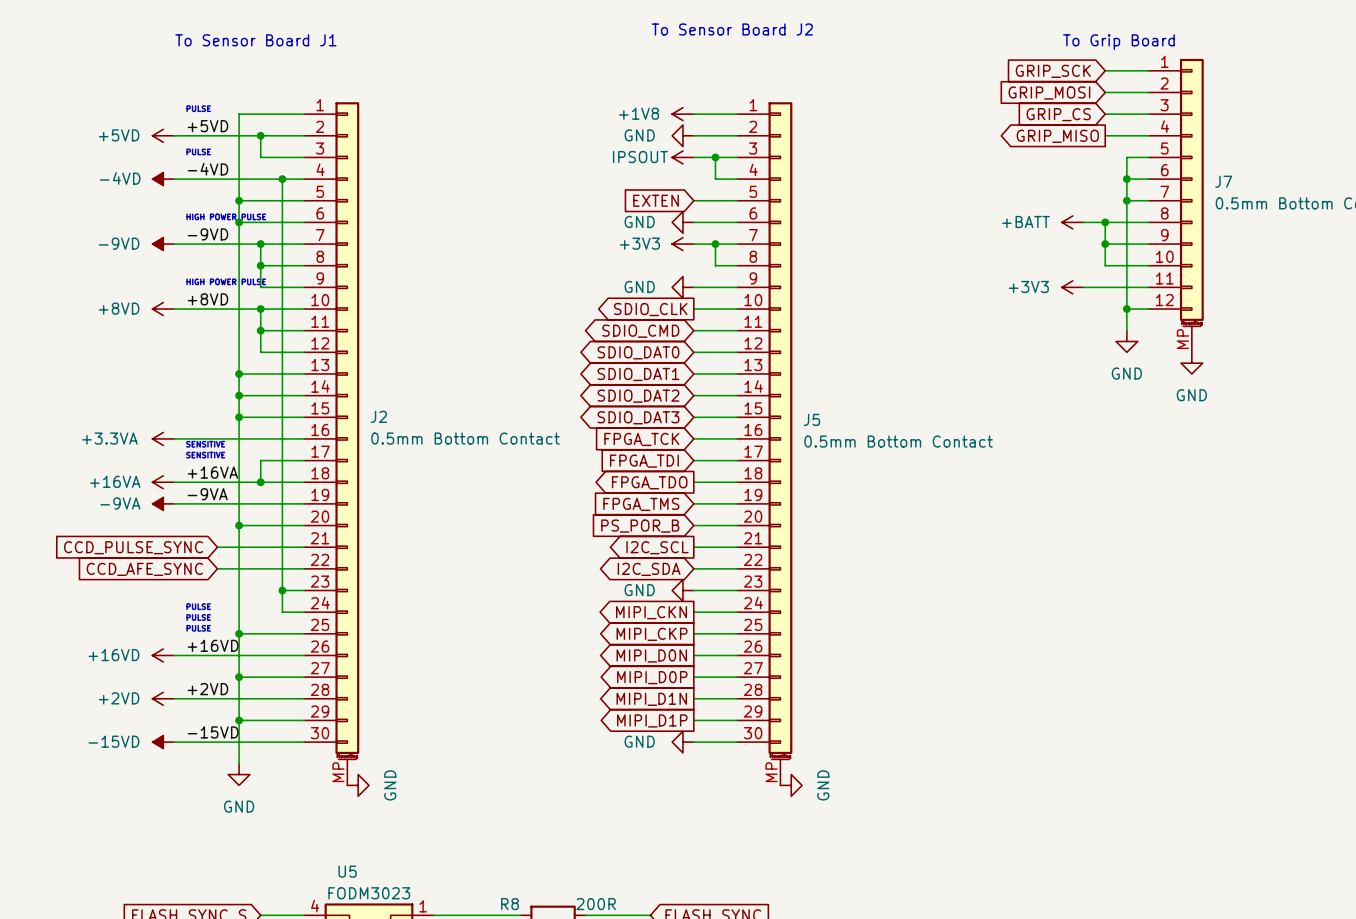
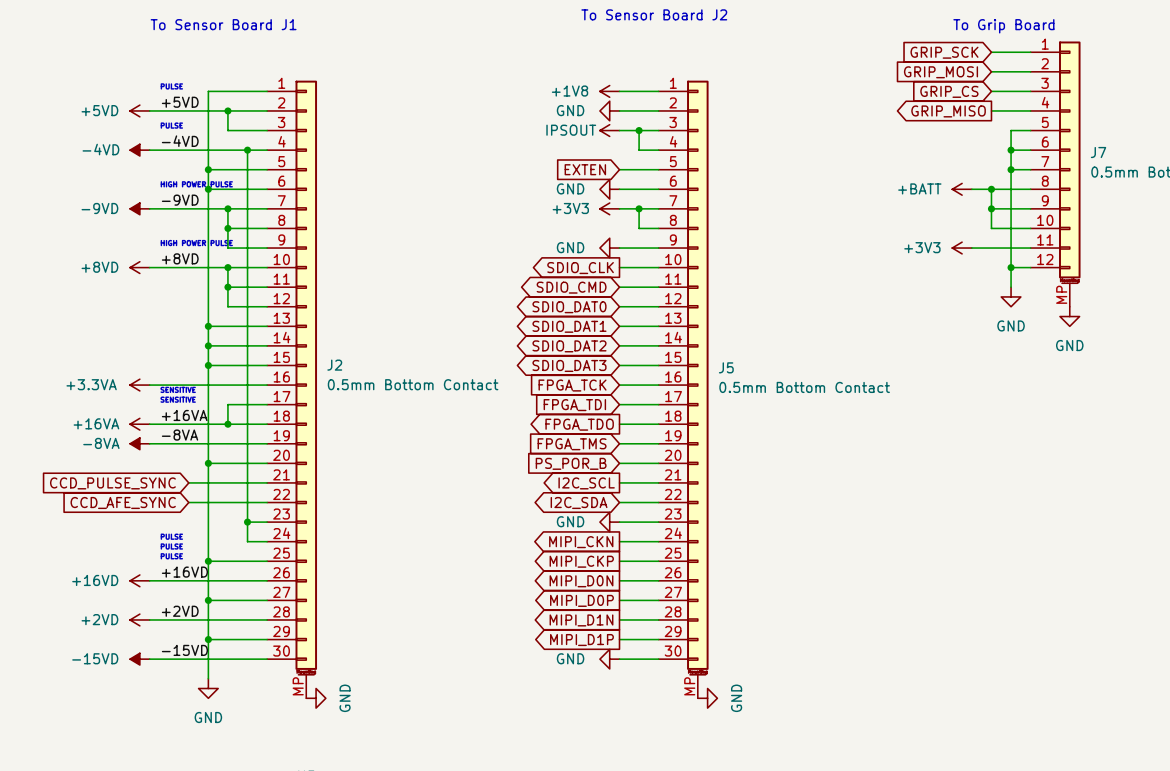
label: -9VA (207, 494) -> -8VA (180, 435)
power symbol: -9VA (163, 503) -> -8VA (139, 443)

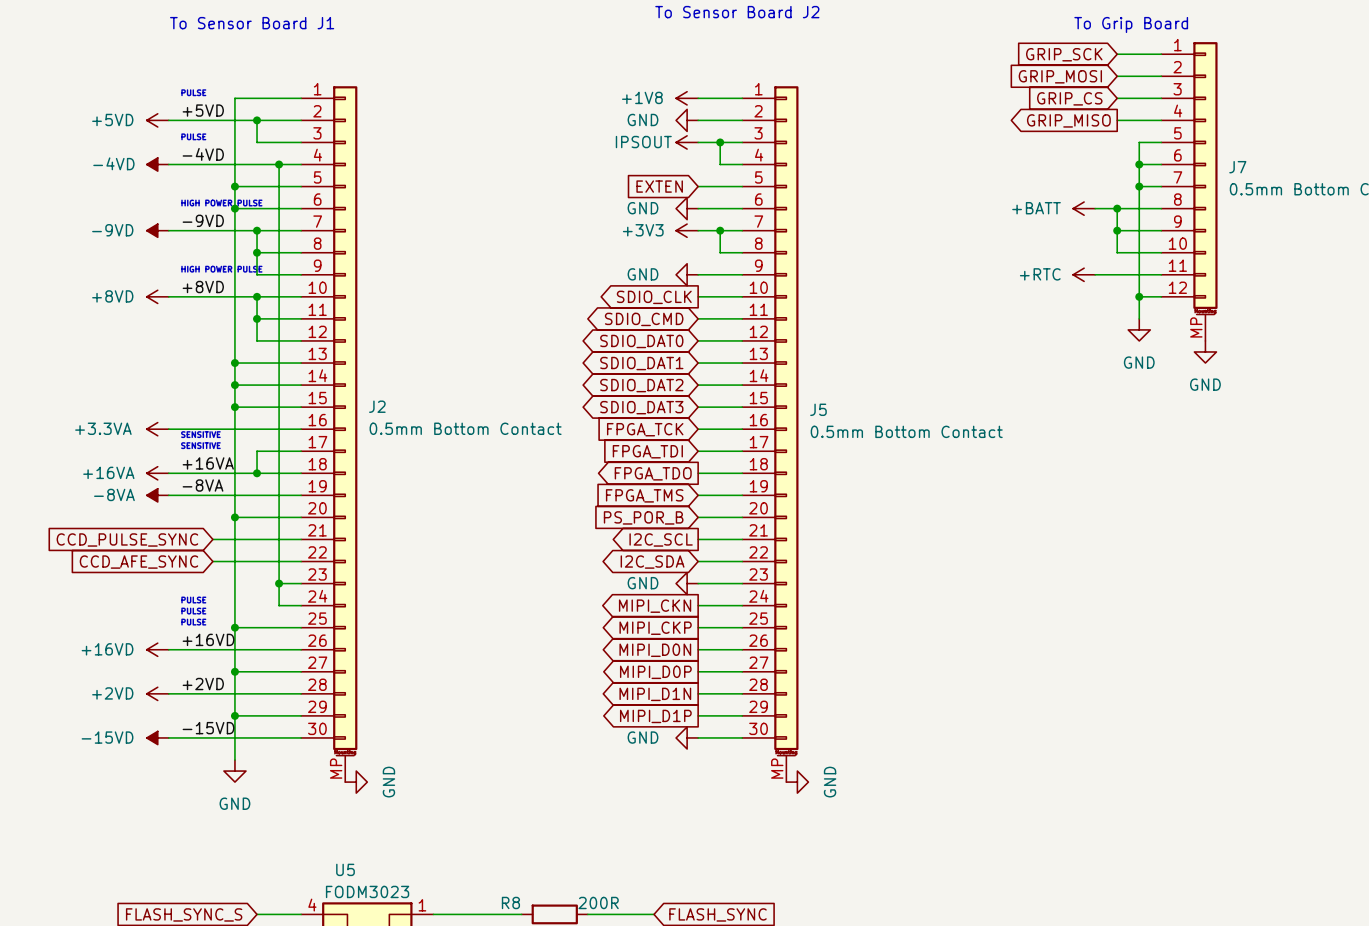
power symbol: +3V3 (962, 248) -> +RTC (1084, 274)

